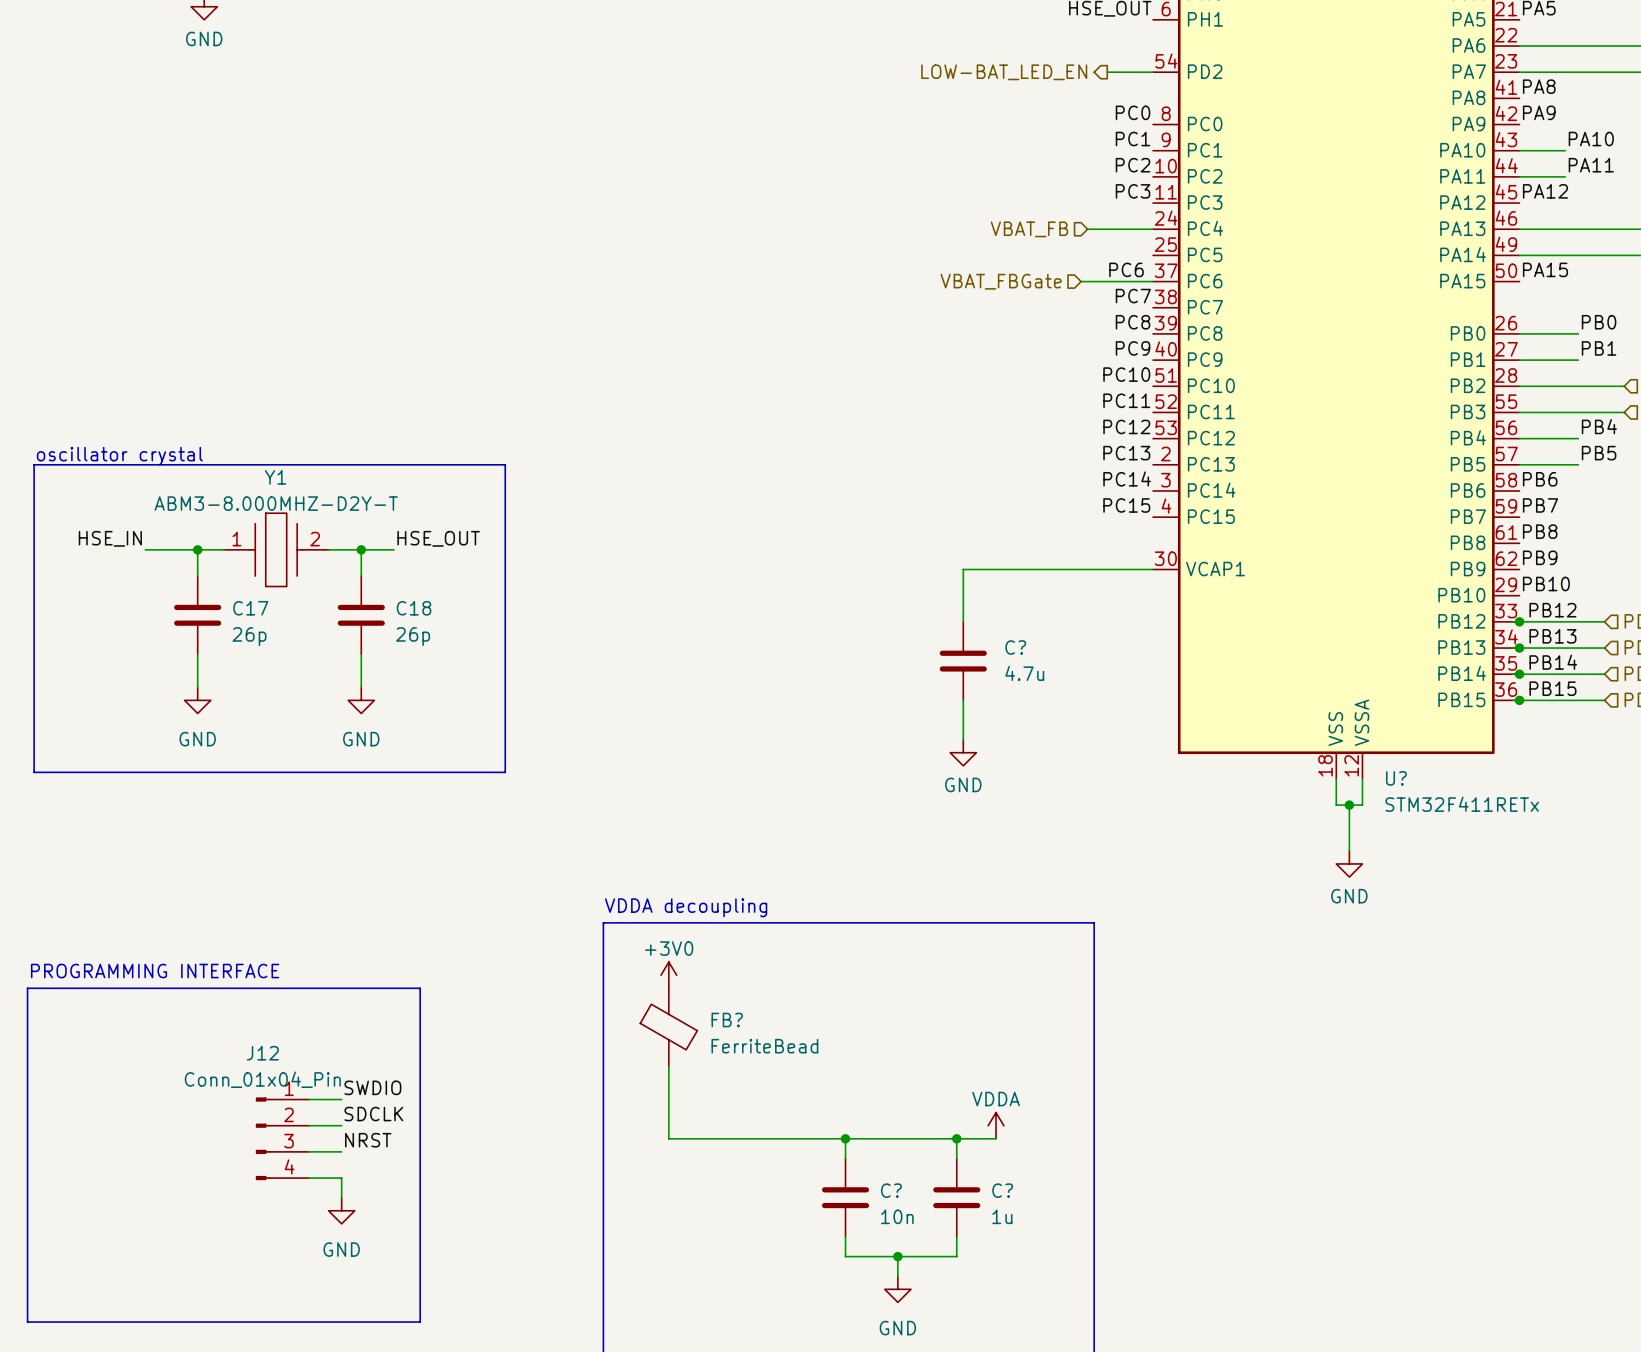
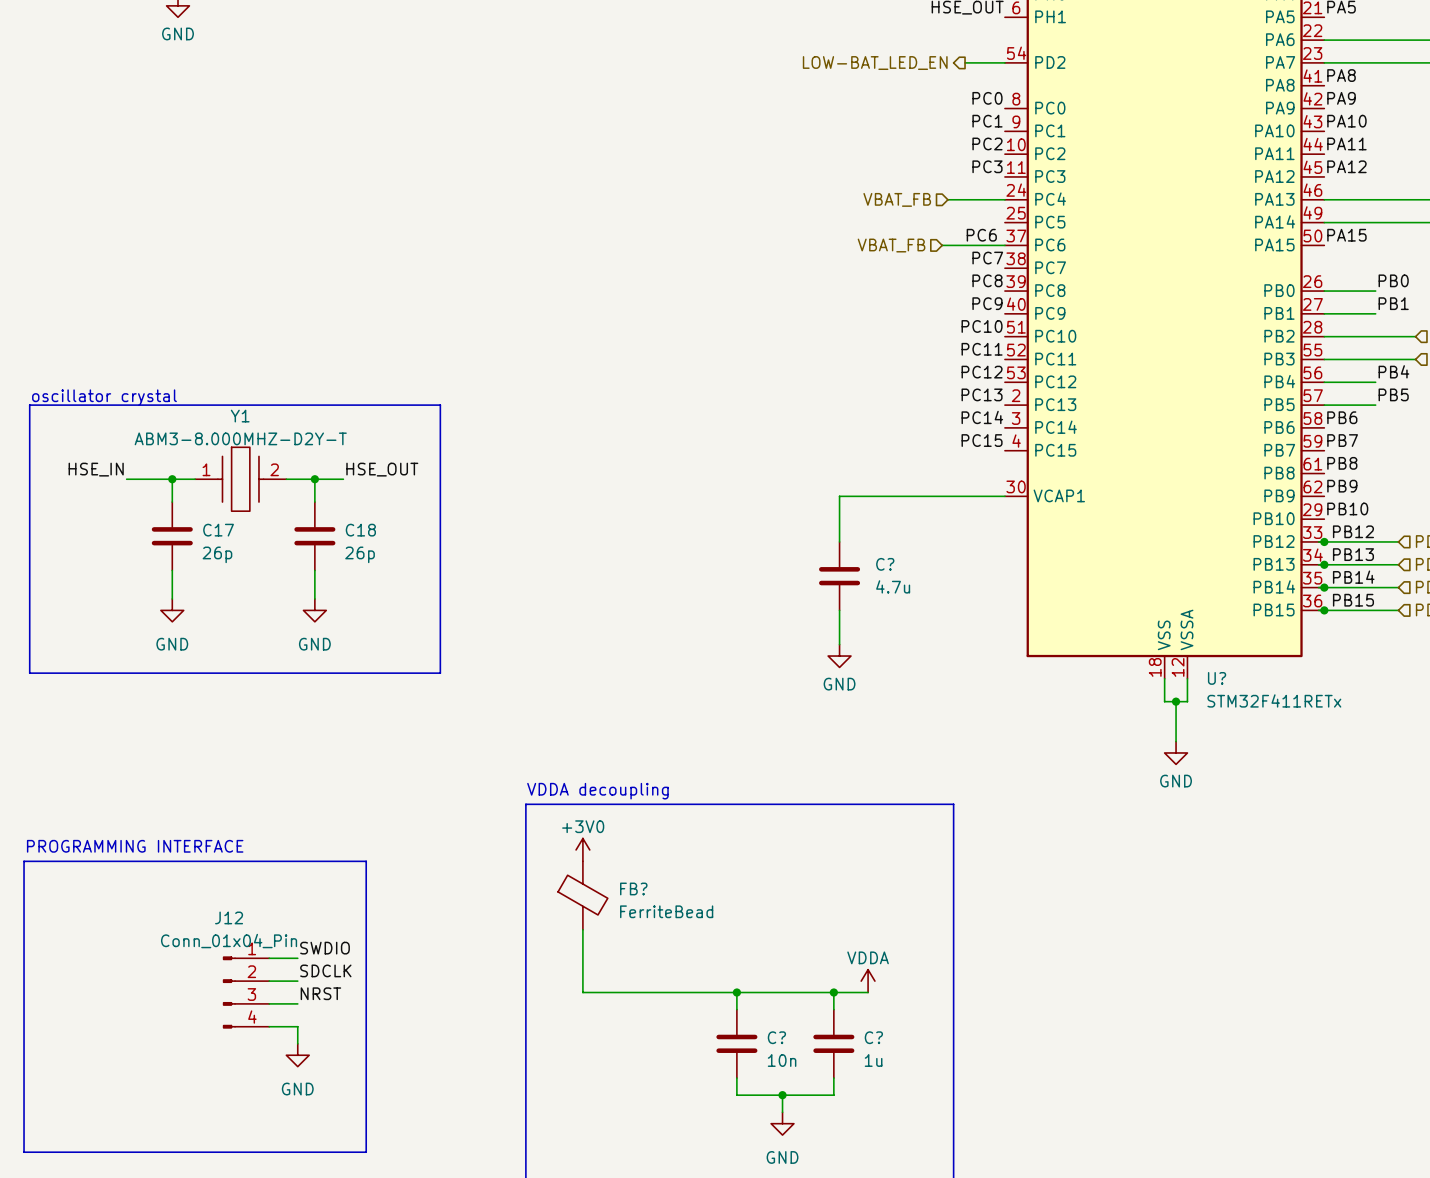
label position: PA10 (1591, 139) -> PA10 (1346, 121)
wire: (1519, 150) (1565, 150) -> none
label position: PA11 (1591, 165) -> PA11 (1346, 143)
wire: (1519, 176) (1565, 176) -> none
hierarchical label: VBAT_FBGate (1001, 281) -> VBAT_FB (891, 245)

